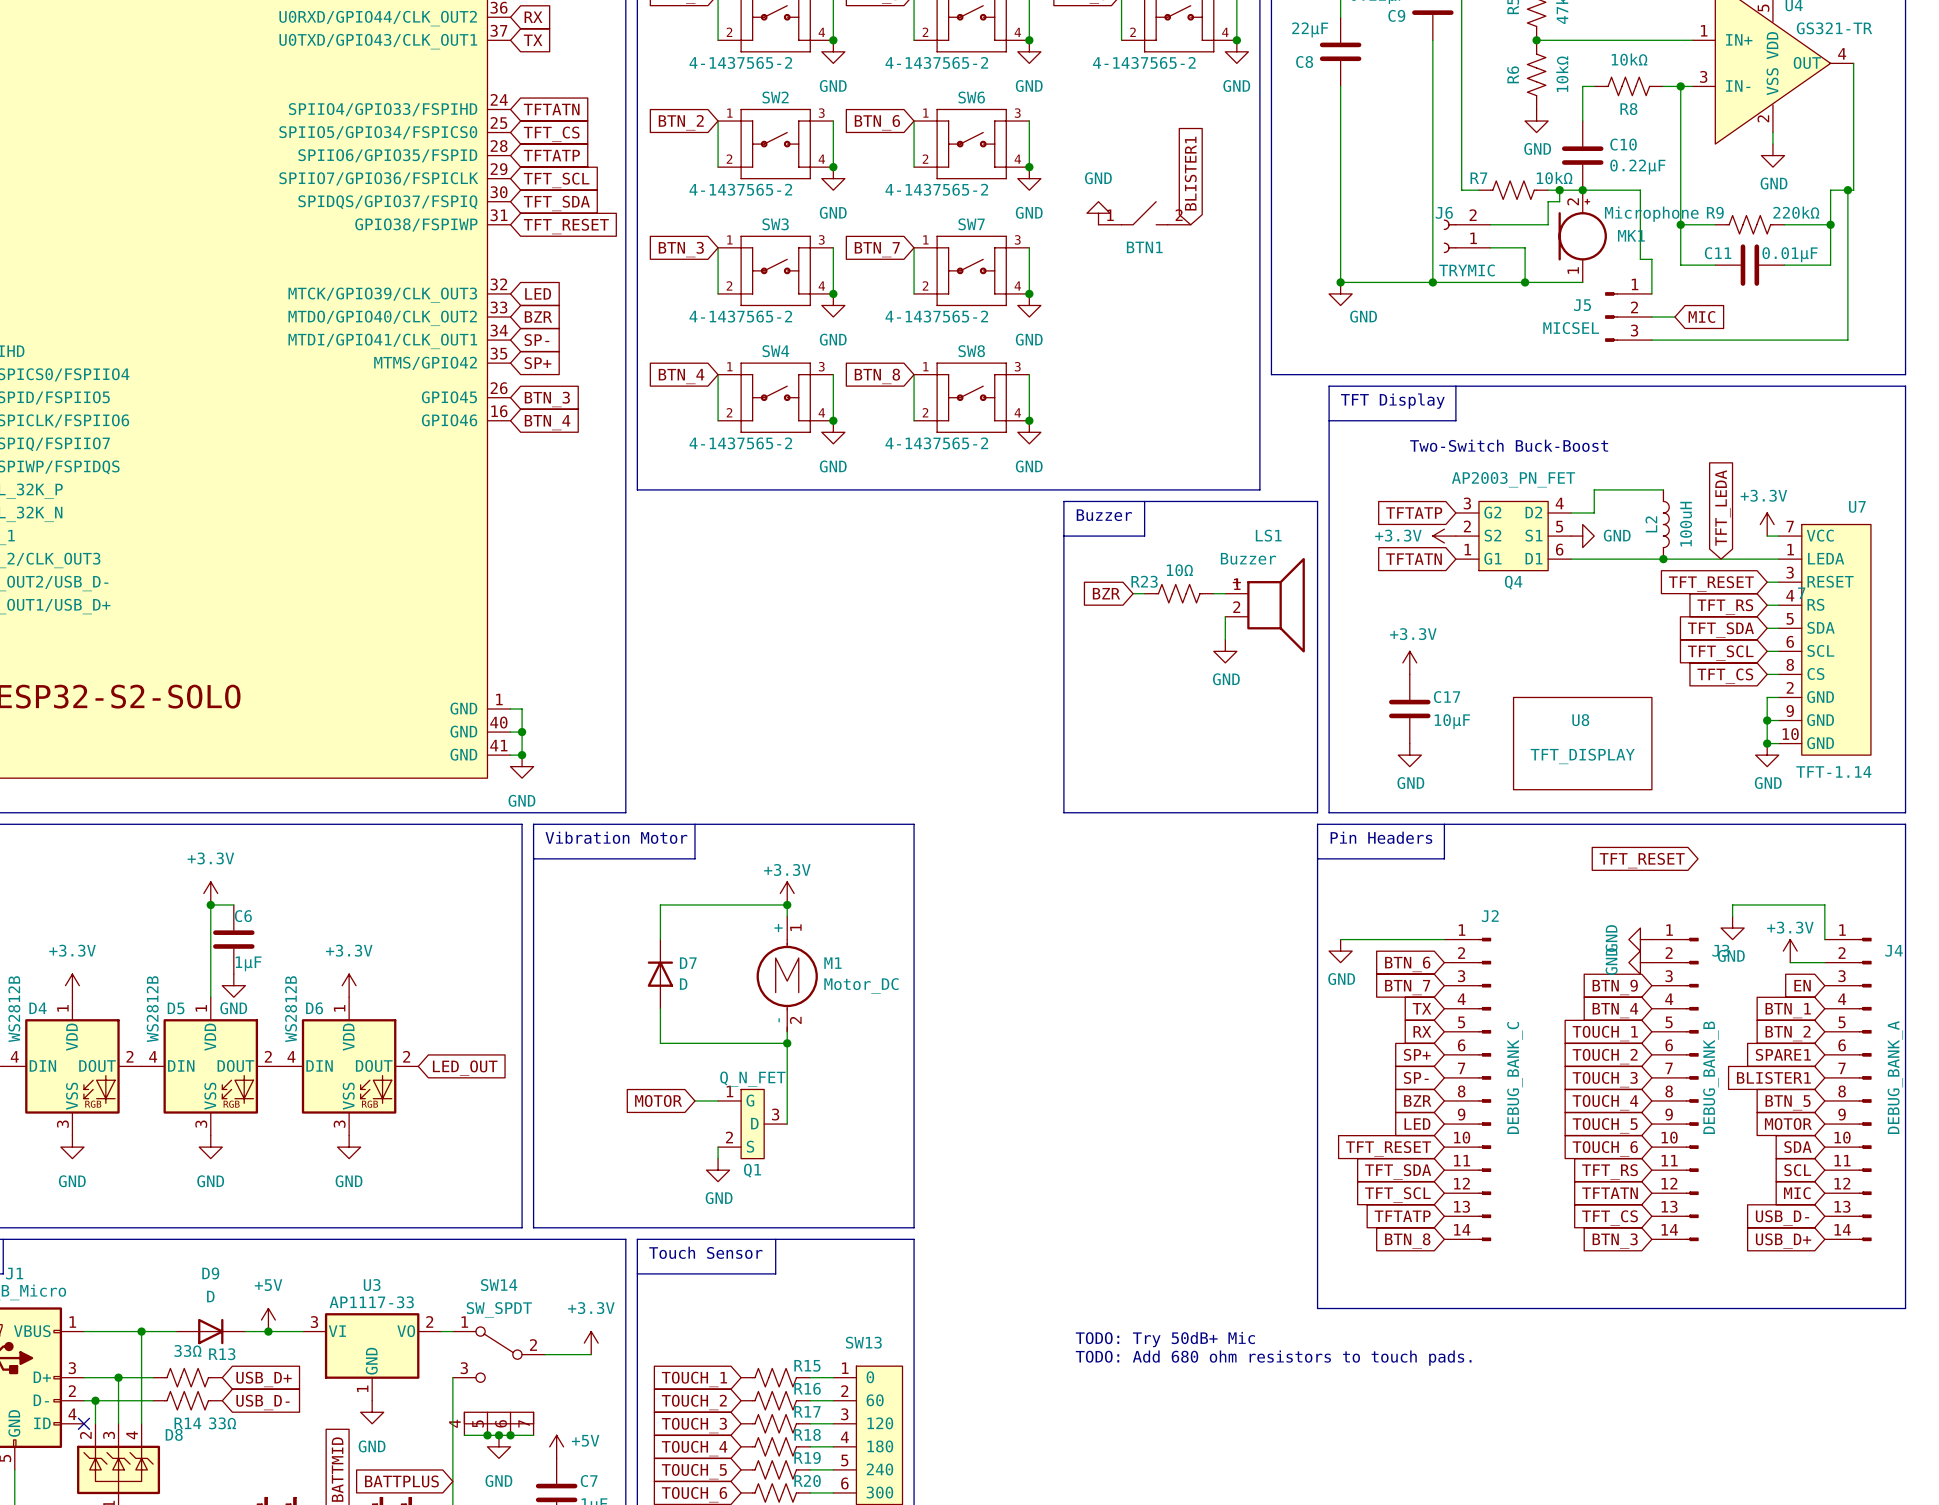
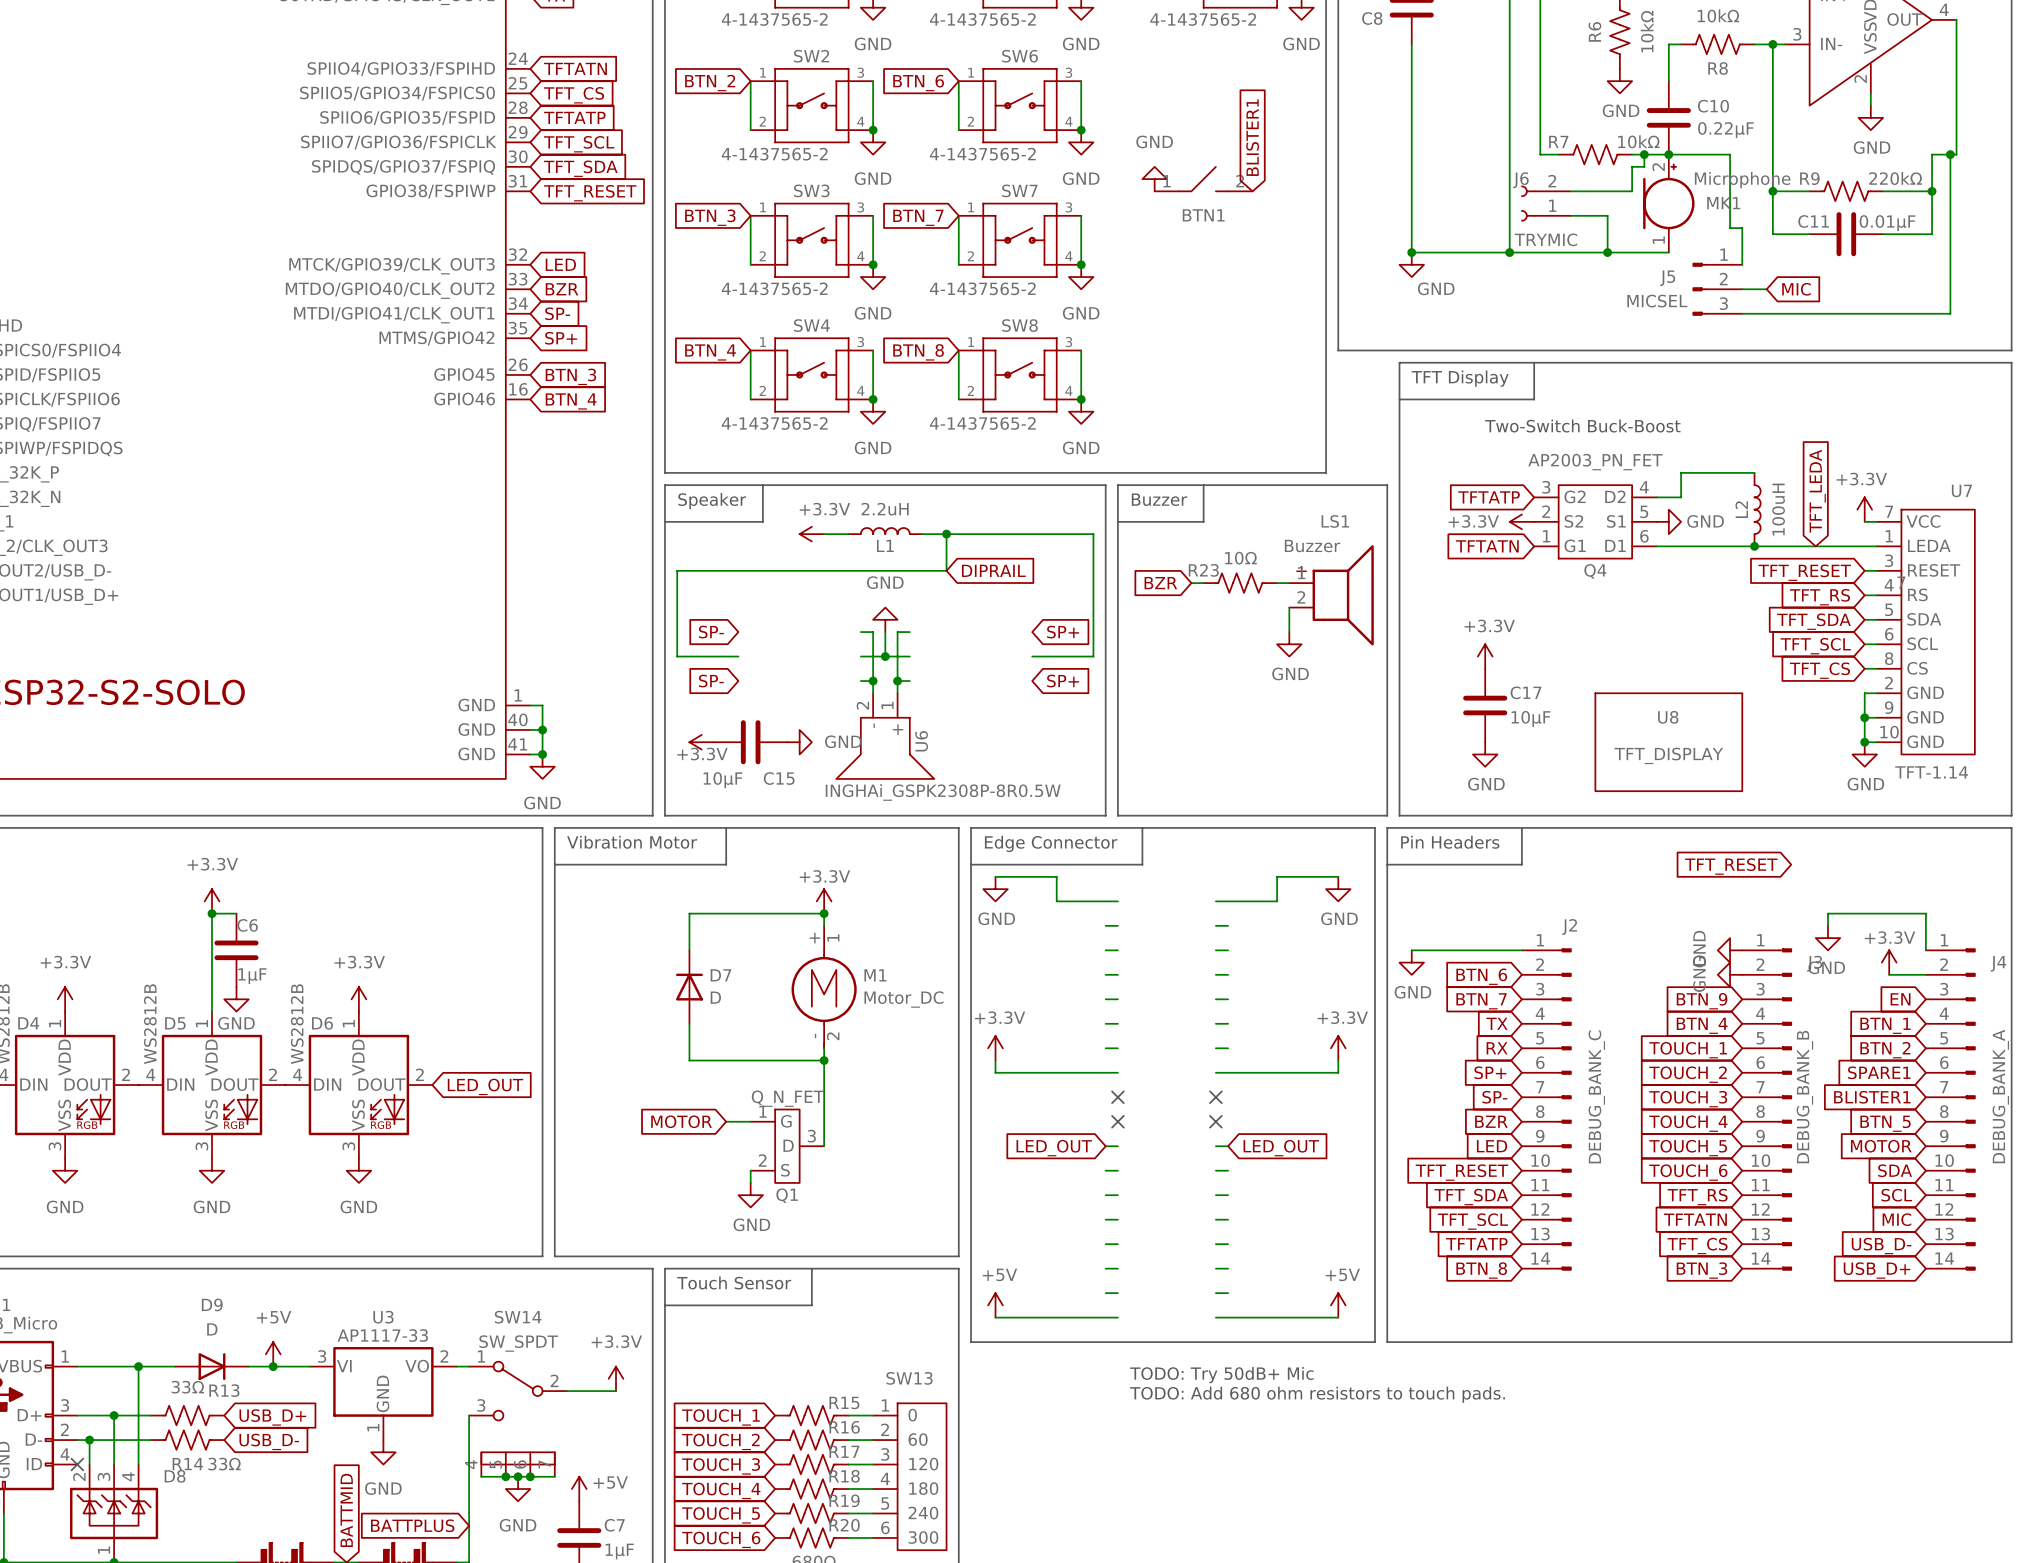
line: none -> (664, 485) (1105, 485) (1105, 815) (664, 815) (664, 485)
line: none -> (762, 485) (762, 521) (664, 521)
text: none -> Speaker (712, 501)
L1: none -> 2.2uH (885, 531)
power symbol: none -> +3.3V (811, 534)
wire: none -> (824, 534) (848, 534)
wire: none -> (922, 534) (1093, 534) (1093, 656) (1032, 656)
wire: none -> (946, 534) (946, 570) (677, 570) (677, 656) (738, 656)
junction: none -> (946, 534)
global label: none -> DIPRAIL (993, 570)
power symbol: none -> GND (885, 619)
global label: none -> SP- (711, 632)
wire: none -> (860, 632) (873, 632) (873, 693)
wire: none -> (885, 632) (885, 656)
wire: none -> (909, 632) (897, 632) (897, 693)
global label: none -> SP+ (1063, 632)
wire: none -> (860, 656) (909, 656)
junction: none -> (885, 656)
global label: none -> SP- (711, 681)
wire: none -> (860, 681) (873, 681)
junction: none -> (873, 681)
wire: none -> (897, 681) (909, 681)
junction: none -> (897, 681)
global label: none -> SP+ (1063, 681)
U6: none -> INGHAi_GSPK2308P-8R0.5W (885, 736)
power symbol: none -> +3.3V (701, 742)
C15: none -> 10μF (750, 742)
power symbol: none -> GND (799, 742)
line: none -> (971, 827) (971, 1342) (1375, 1342) (1375, 827) (971, 827)
line: none -> (1142, 827) (1142, 864) (971, 864)
text: none -> Edge Connector (1051, 843)
wire: none -> (995, 876) (1056, 876) (1056, 901) (1117, 901)
wire: none -> (1338, 876) (1277, 876) (1277, 901) (1215, 901)
power symbol: none -> GND (995, 889)
power symbol: none -> GND (1338, 889)
wire: none -> (1105, 925) (1117, 925)
wire: none -> (1215, 925) (1228, 925)
wire: none -> (1105, 950) (1117, 950)
wire: none -> (1215, 950) (1228, 950)
wire: none -> (1105, 974) (1117, 974)
wire: none -> (1215, 974) (1228, 974)
wire: none -> (1105, 999) (1117, 999)
wire: none -> (1215, 999) (1228, 999)
wire: none -> (1105, 1023) (1117, 1023)
wire: none -> (1215, 1023) (1228, 1023)
power symbol: none -> +3.3V (995, 1048)
wire: none -> (1105, 1048) (1117, 1048)
wire: none -> (1215, 1048) (1228, 1048)
power symbol: none -> +3.3V (1338, 1048)
wire: none -> (995, 1060) (995, 1072) (1117, 1072)
wire: none -> (1338, 1060) (1338, 1072) (1215, 1072)
no-connect mark: none -> (1117, 1097)
no-connect mark: none -> (1215, 1097)
no-connect mark: none -> (1117, 1121)
no-connect mark: none -> (1215, 1121)
wire: none -> (1105, 1146) (1117, 1146)
wire: none -> (1215, 1146) (1228, 1146)
global label: none -> LED_OUT (1054, 1148)
global label: none -> LED_OUT (1281, 1148)
wire: none -> (1105, 1170) (1117, 1170)
wire: none -> (1215, 1170) (1228, 1170)
wire: none -> (1105, 1195) (1117, 1195)
wire: none -> (1215, 1195) (1228, 1195)
wire: none -> (1105, 1219) (1117, 1219)
wire: none -> (1215, 1219) (1228, 1219)
wire: none -> (1105, 1244) (1117, 1244)
wire: none -> (1215, 1244) (1228, 1244)
wire: none -> (1105, 1268) (1117, 1268)
wire: none -> (1215, 1268) (1228, 1268)
wire: none -> (1105, 1293) (1117, 1293)
wire: none -> (1215, 1293) (1228, 1293)
power symbol: none -> +5V (995, 1305)
power symbol: none -> +5V (1338, 1305)
wire: none -> (995, 1317) (1117, 1317)
wire: none -> (1215, 1317) (1338, 1317)

